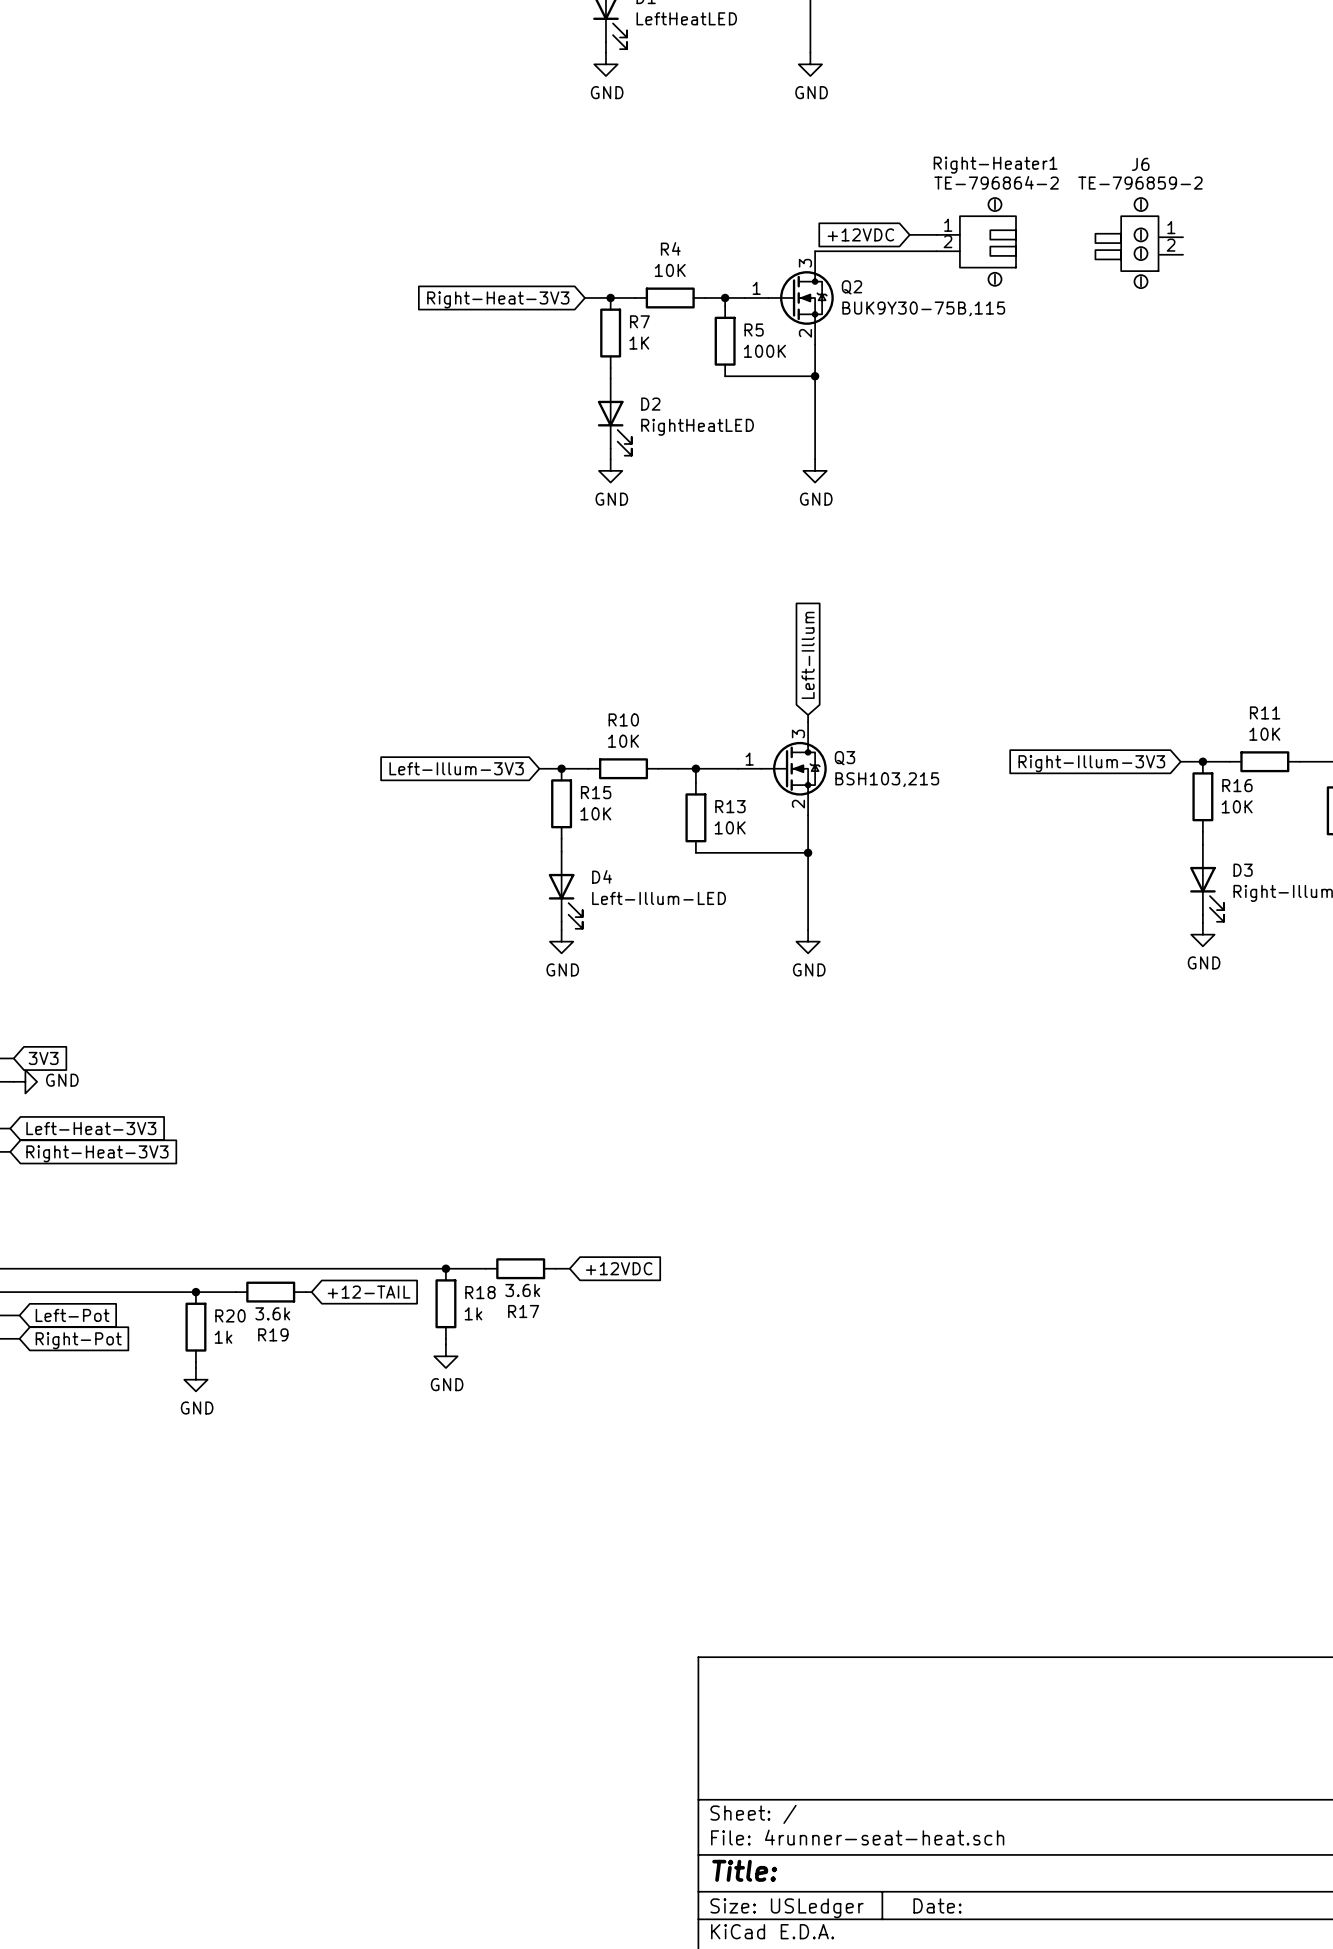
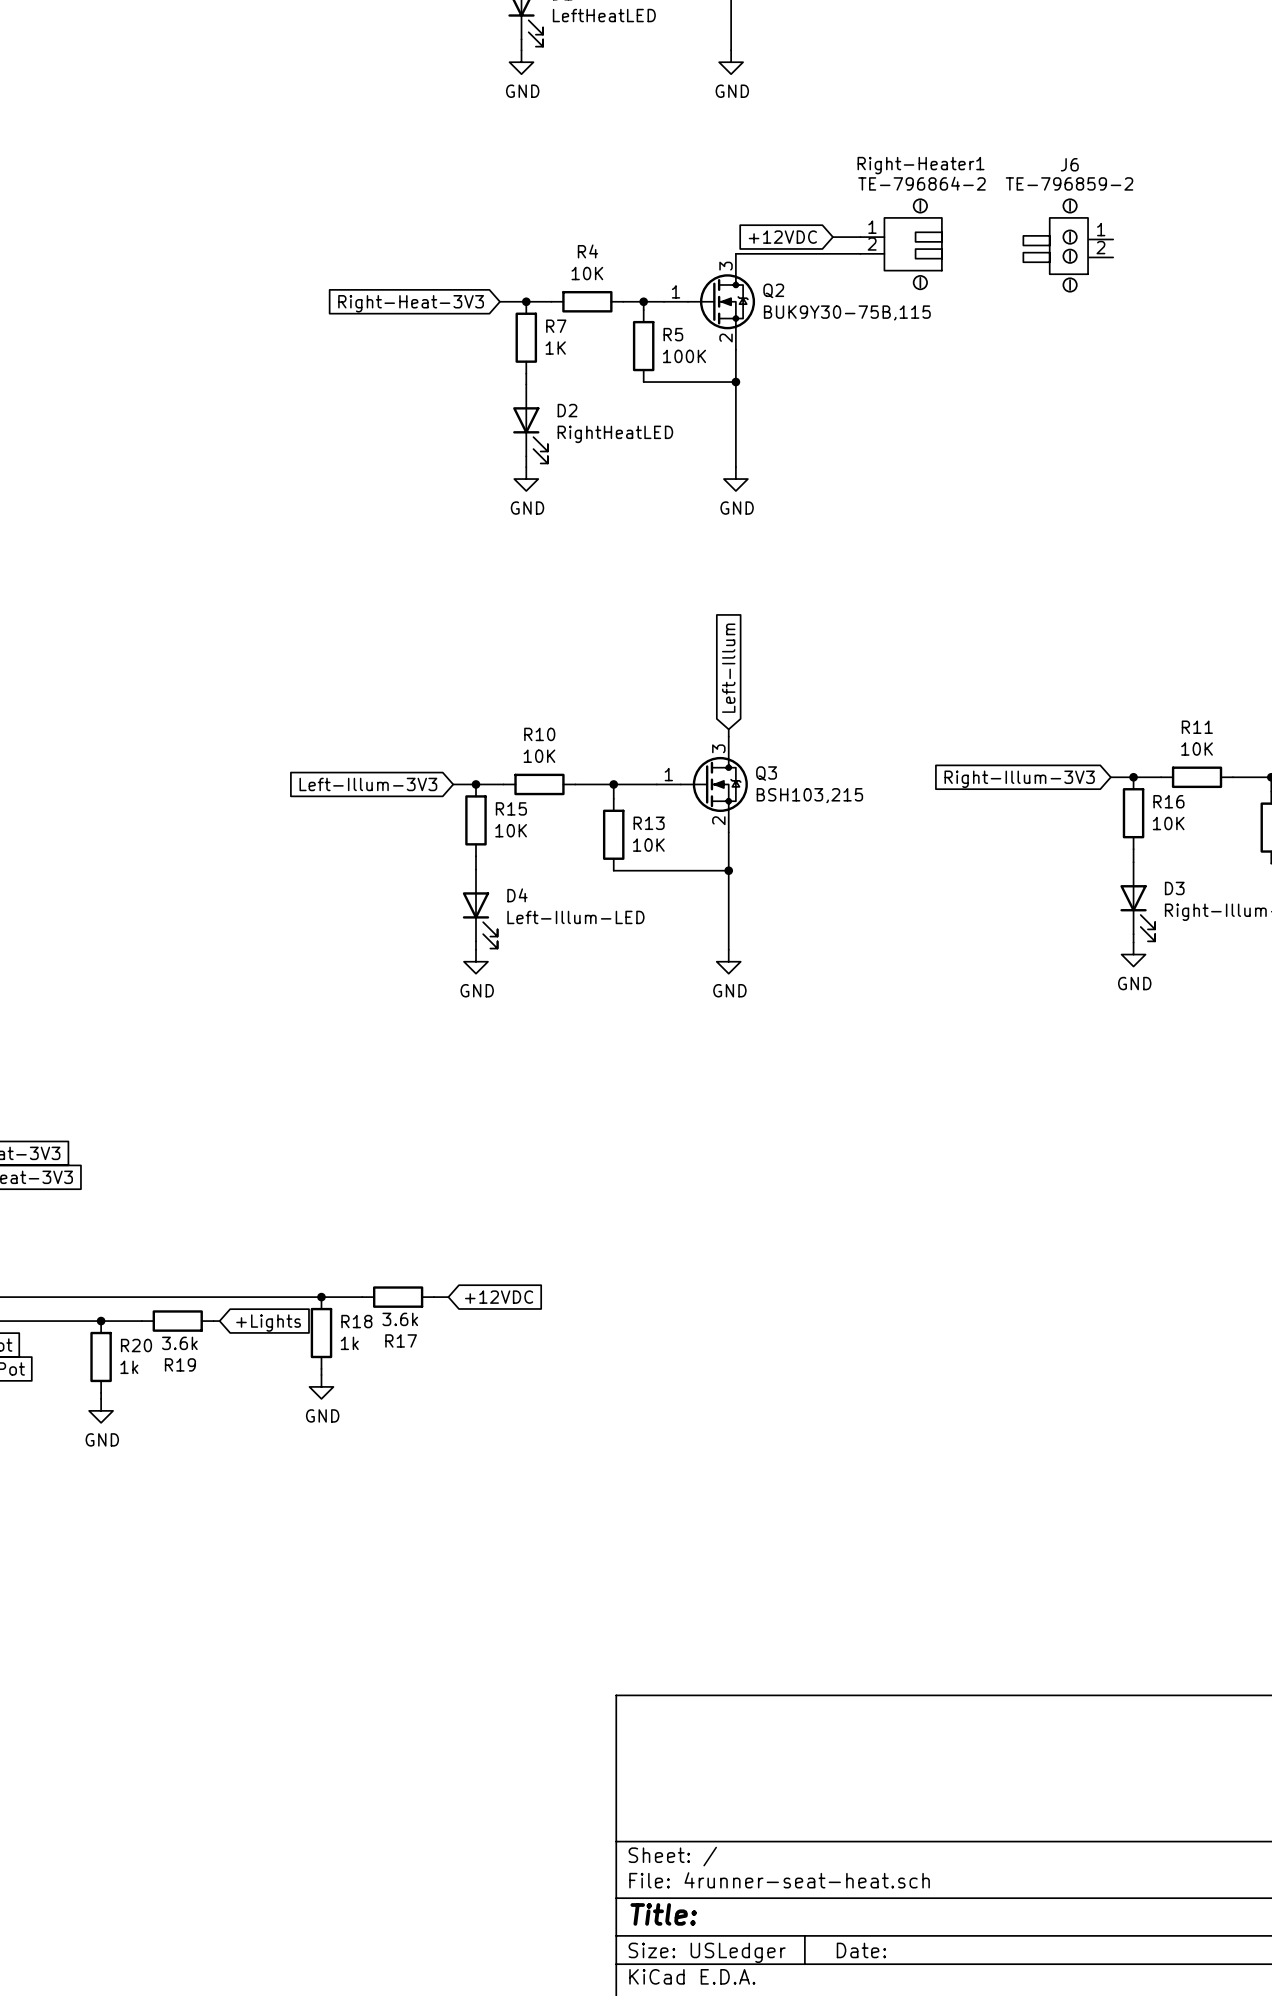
junction position: (445, 1268) -> (321, 1297)
wire: (450, 1268) (485, 1268) -> none
R17 position: (520, 1268) -> (398, 1297)
wire: (555, 1268) (569, 1268) -> (434, 1297) (448, 1297)
global label position: +12VDC (619, 1268) -> +12VDC (499, 1297)
global label: +12-TAIL (369, 1292) -> +Lights (268, 1323)
R18 position: (445, 1303) -> (321, 1333)
wire: (445, 1338) (445, 1344) -> (321, 1368) (321, 1374)
power symbol position: GND (445, 1356) -> GND (321, 1386)

